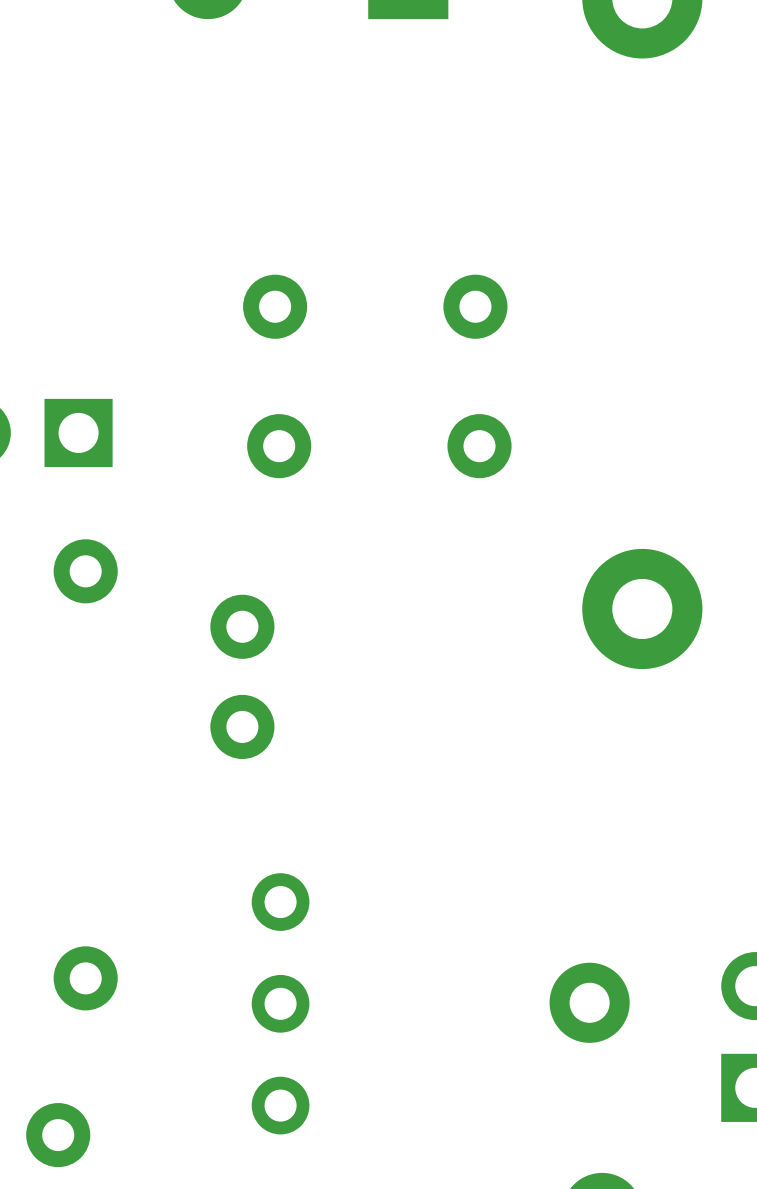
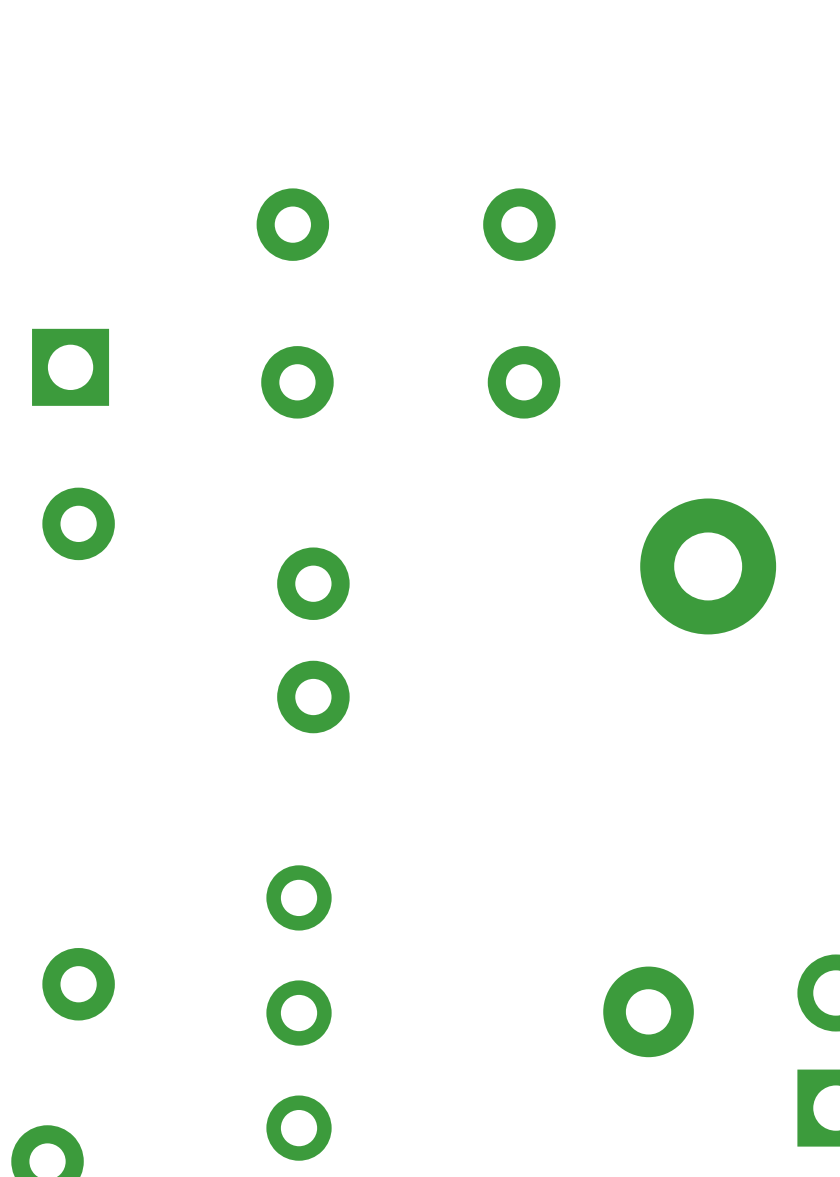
part position: (242, 676) -> (313, 640)

